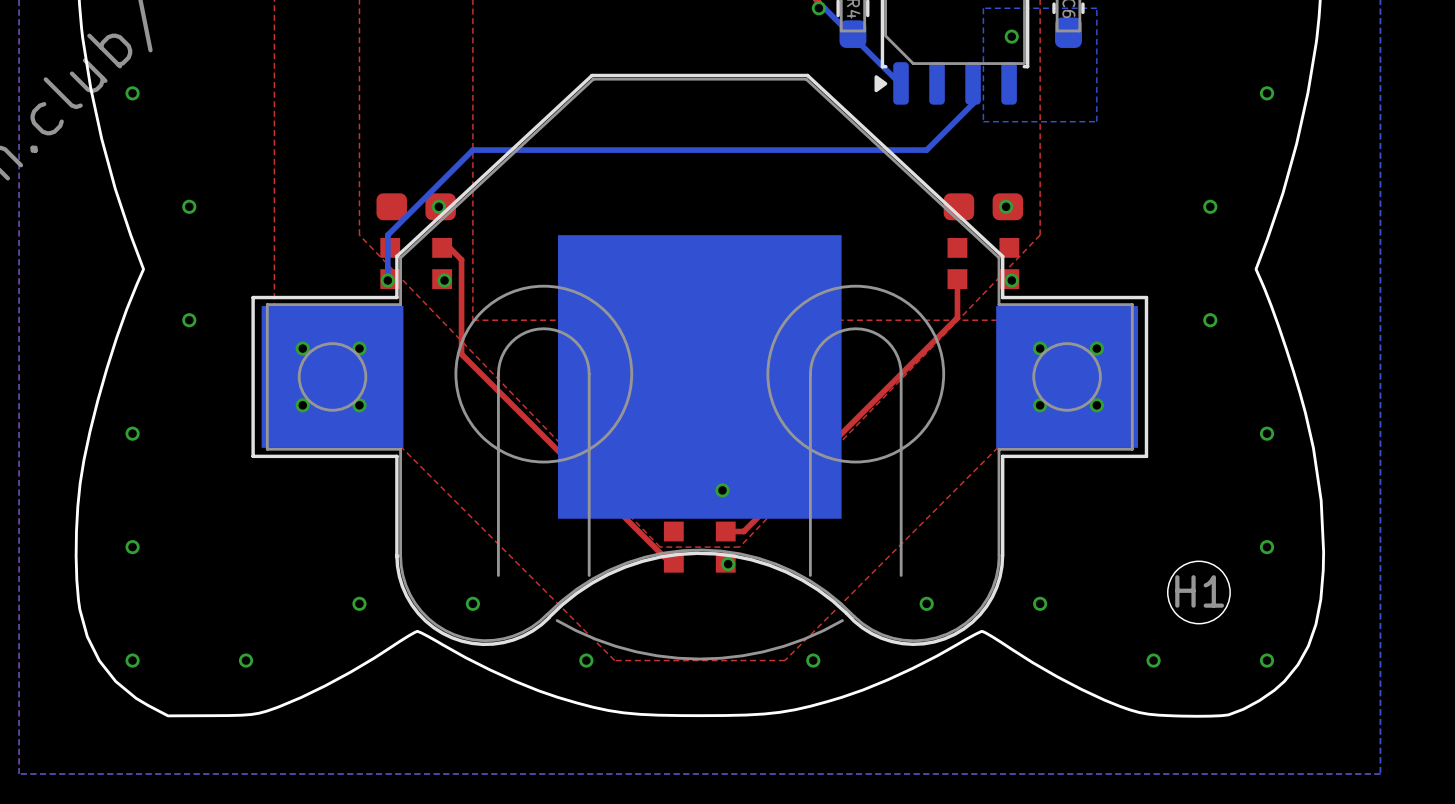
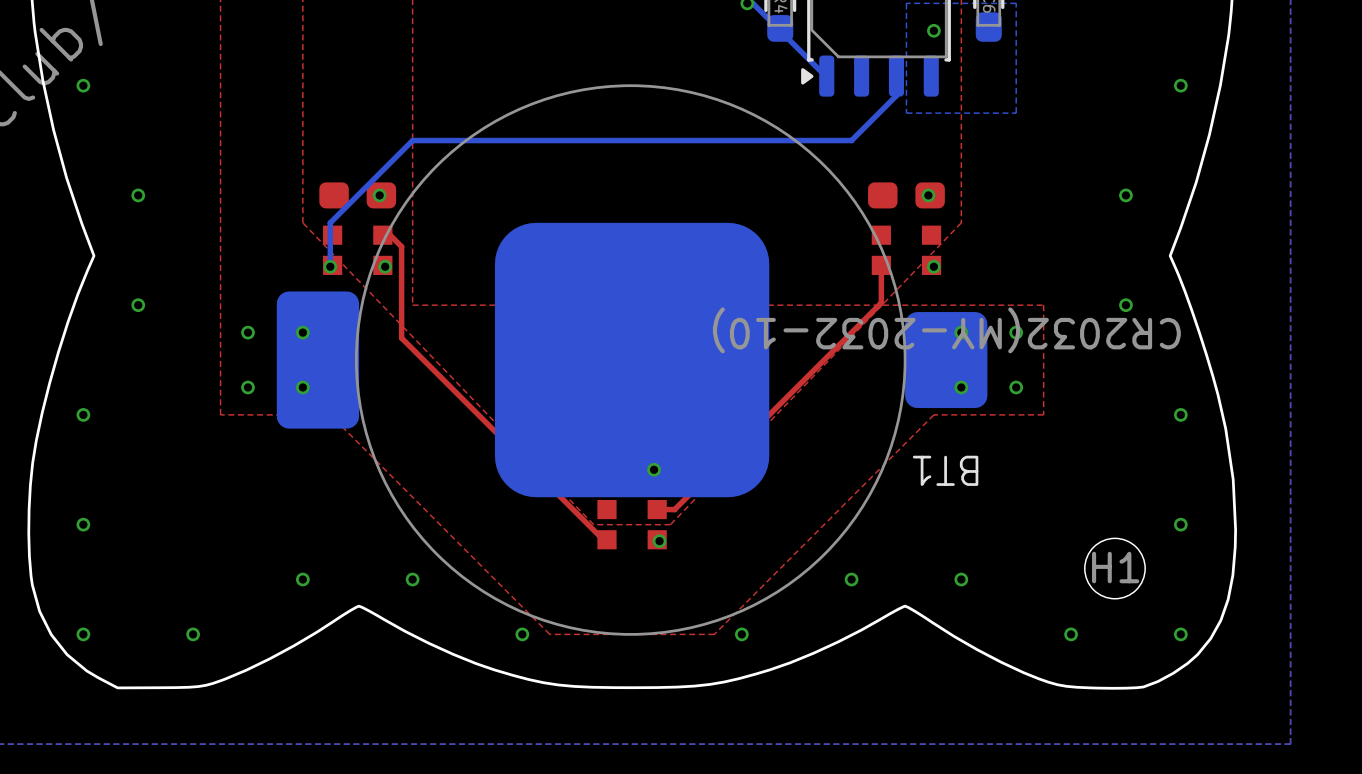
part: (699, 367) -> none
BT1: none -> CR2032(MY-2032-10) (632, 360)

